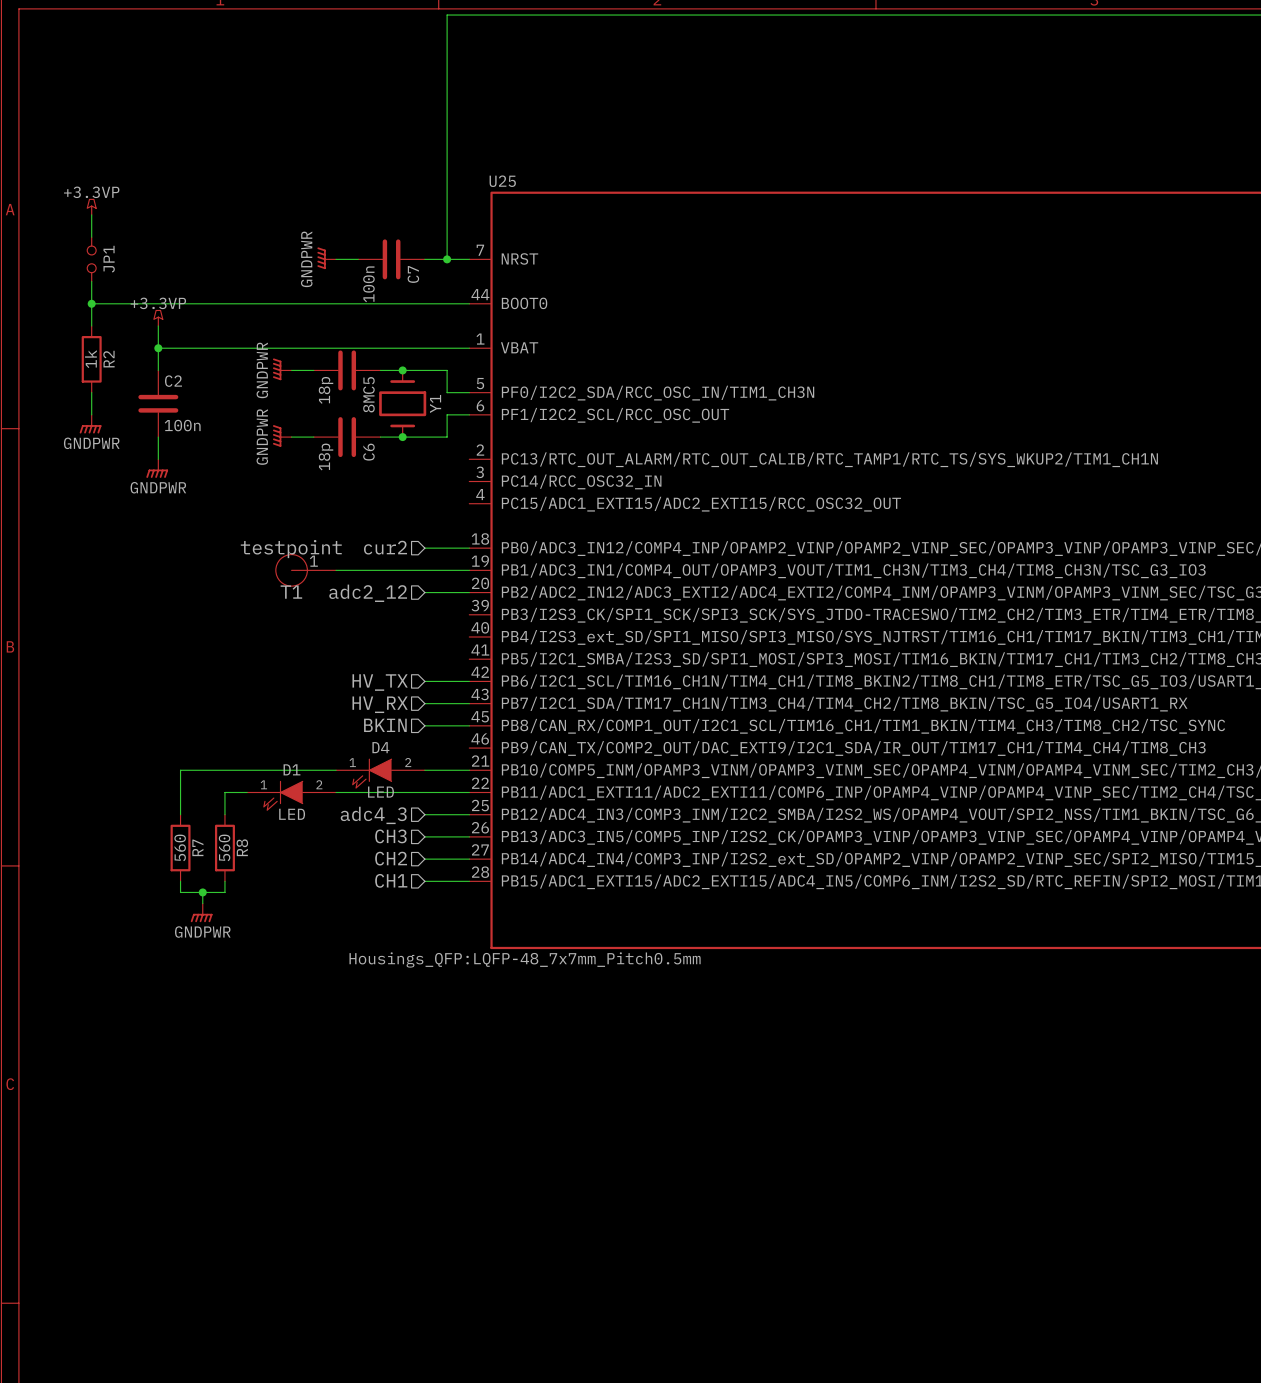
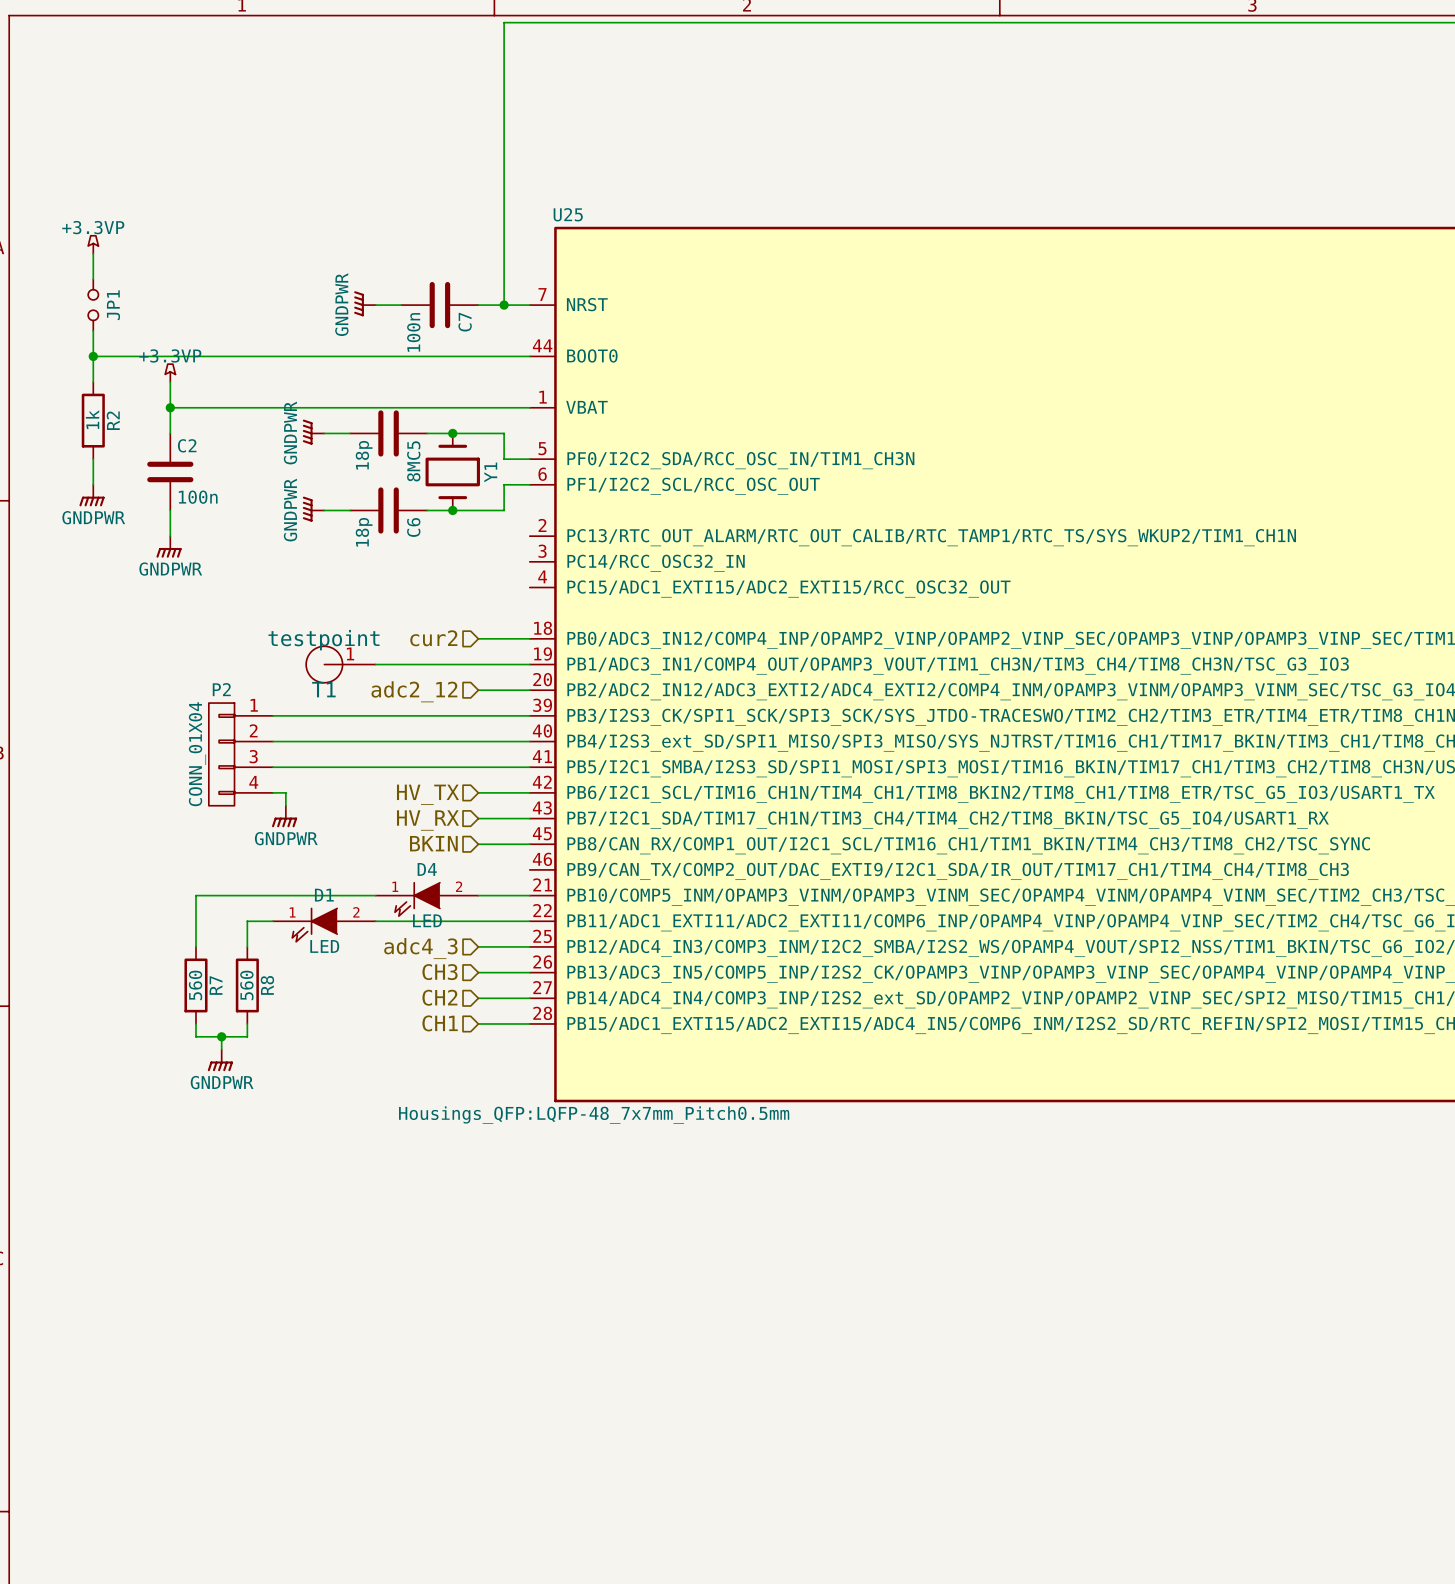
wire: none -> (273, 715) (529, 715)
wire: none -> (273, 741) (529, 741)
P2: none -> CONN_01X04 (240, 754)
wire: none -> (273, 767) (529, 767)
wire: none -> (273, 792) (285, 792) (285, 805)
power symbol: none -> GNDPWR (284, 816)

